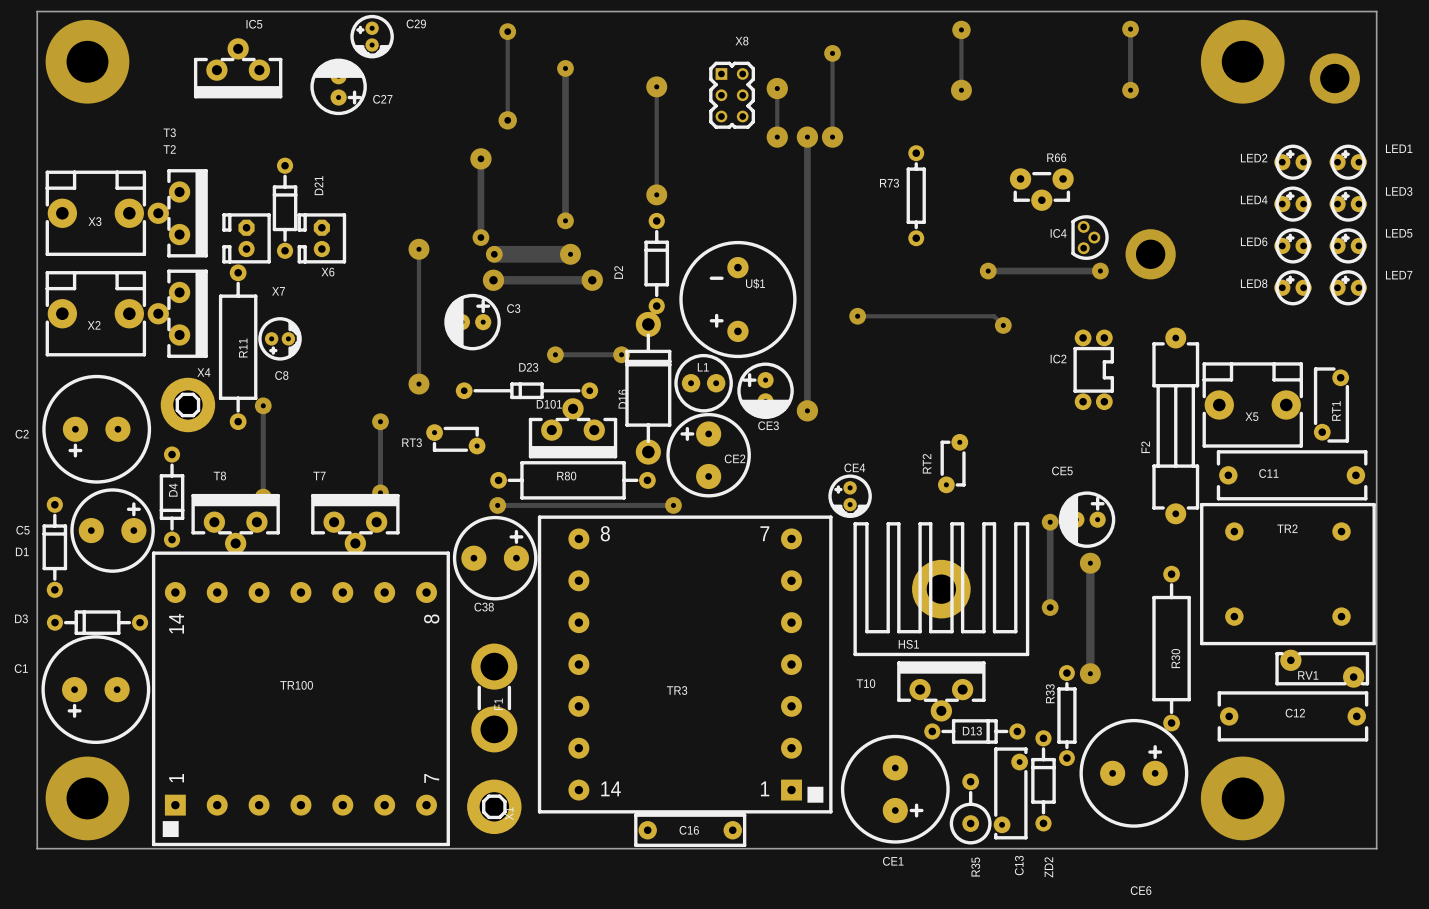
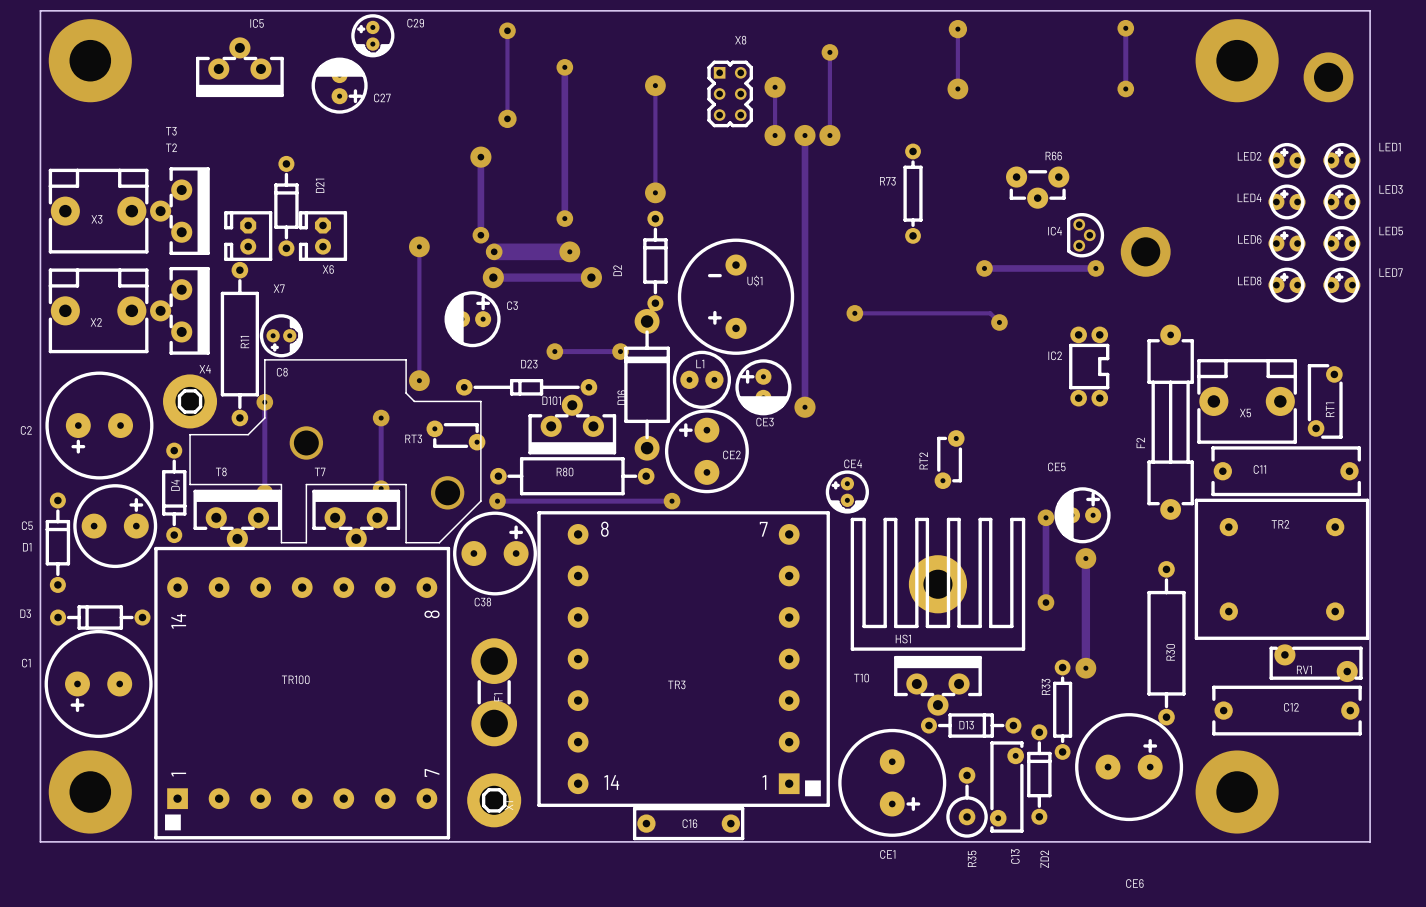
line: none -> (264, 359) (406, 359) (406, 393) (414, 401) (480, 401) (480, 501) (439, 542) (406, 542) (406, 484) (306, 484) (306, 542) (281, 542) (281, 484) (190, 484) (190, 434) (248, 434) (264, 418) (264, 359)
via: none -> (306, 442)
via: none -> (447, 492)

